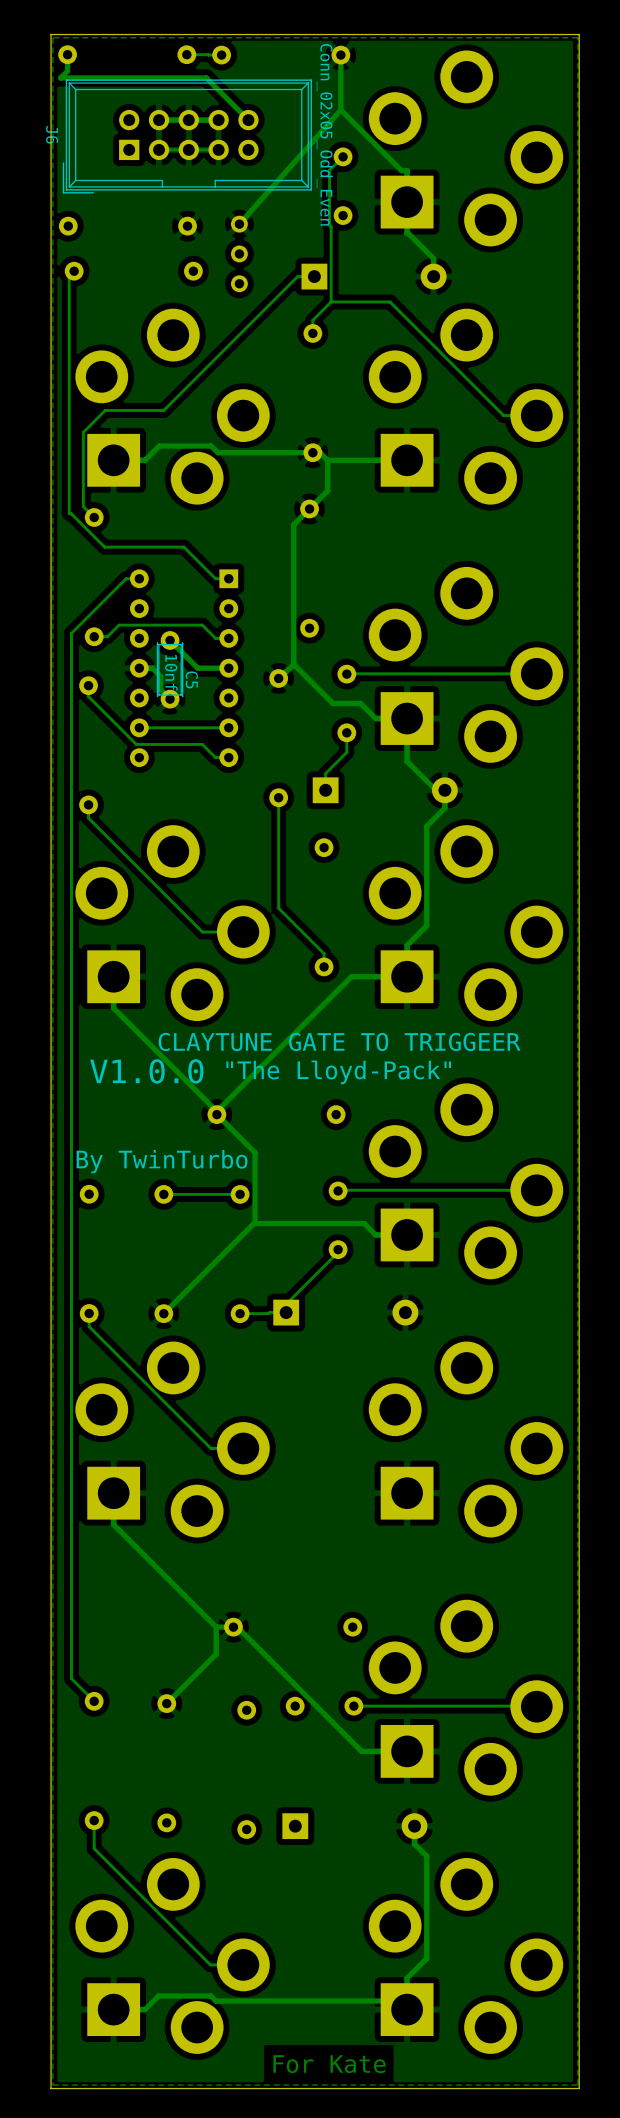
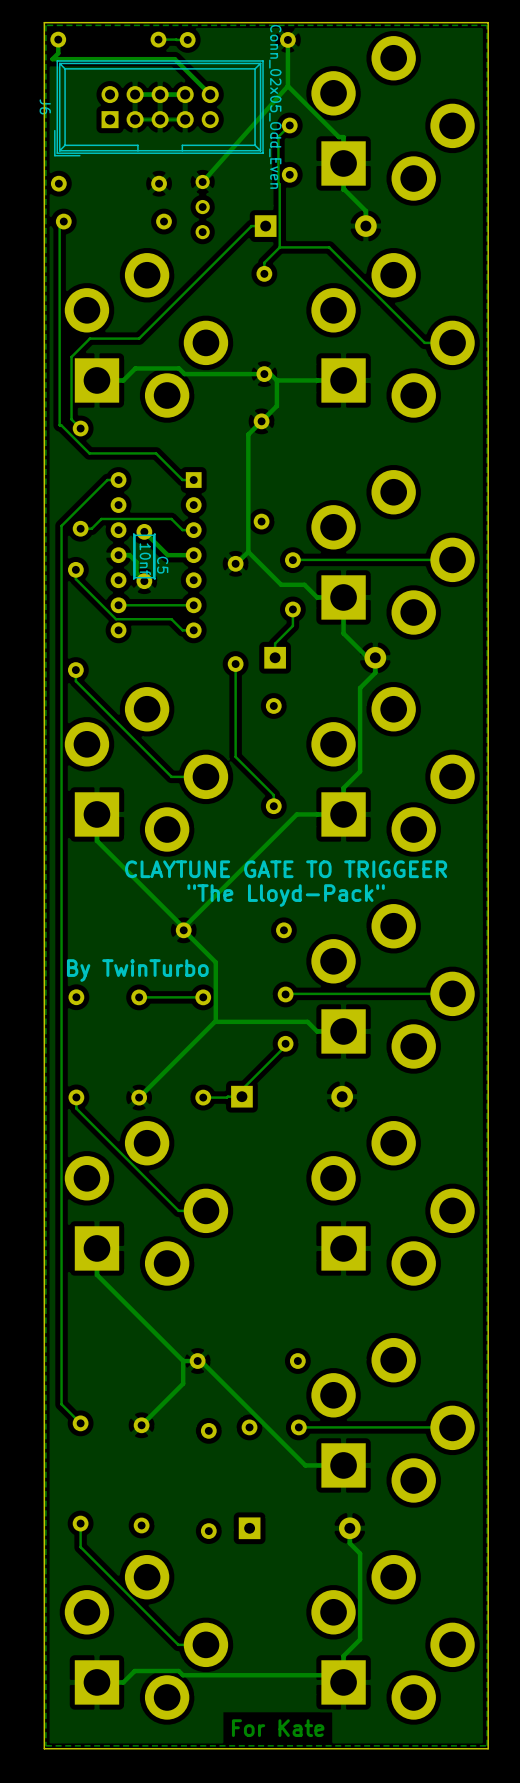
text: V1.0.0 (146, 1071) -> none

